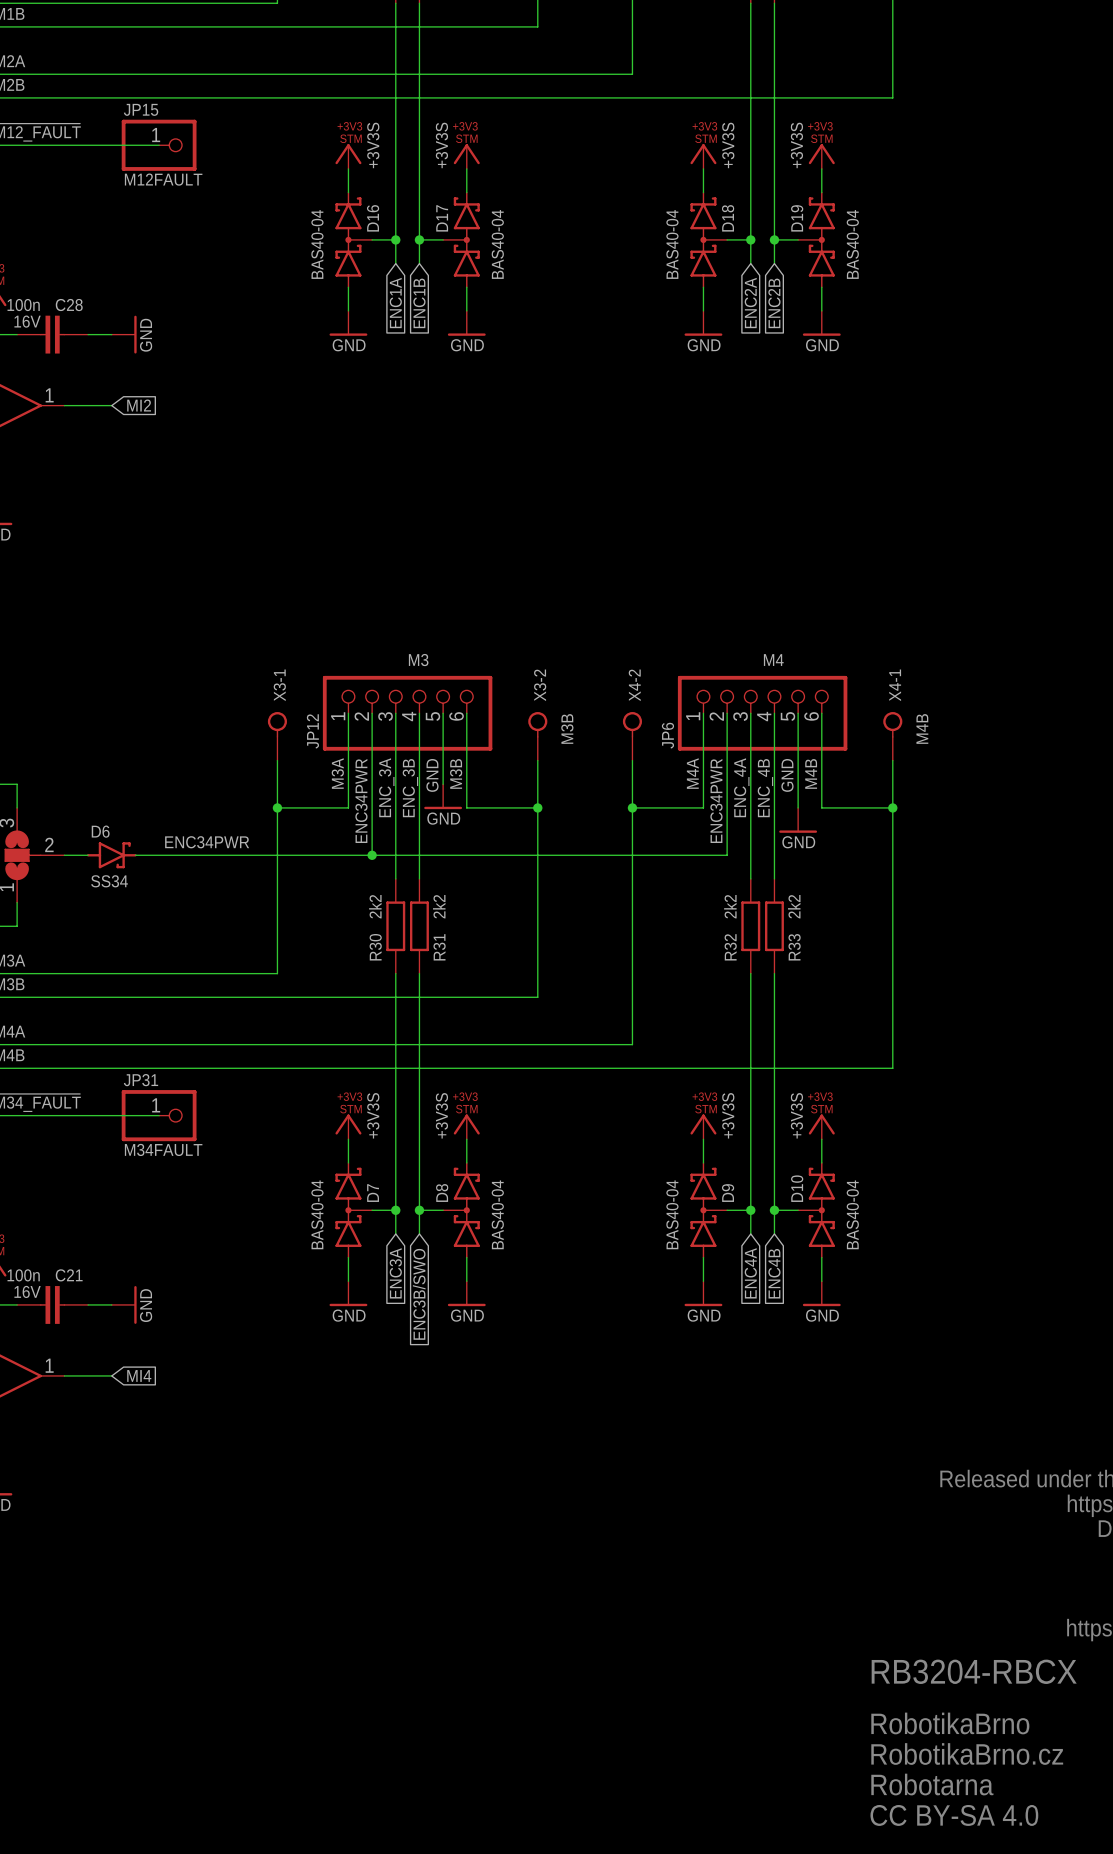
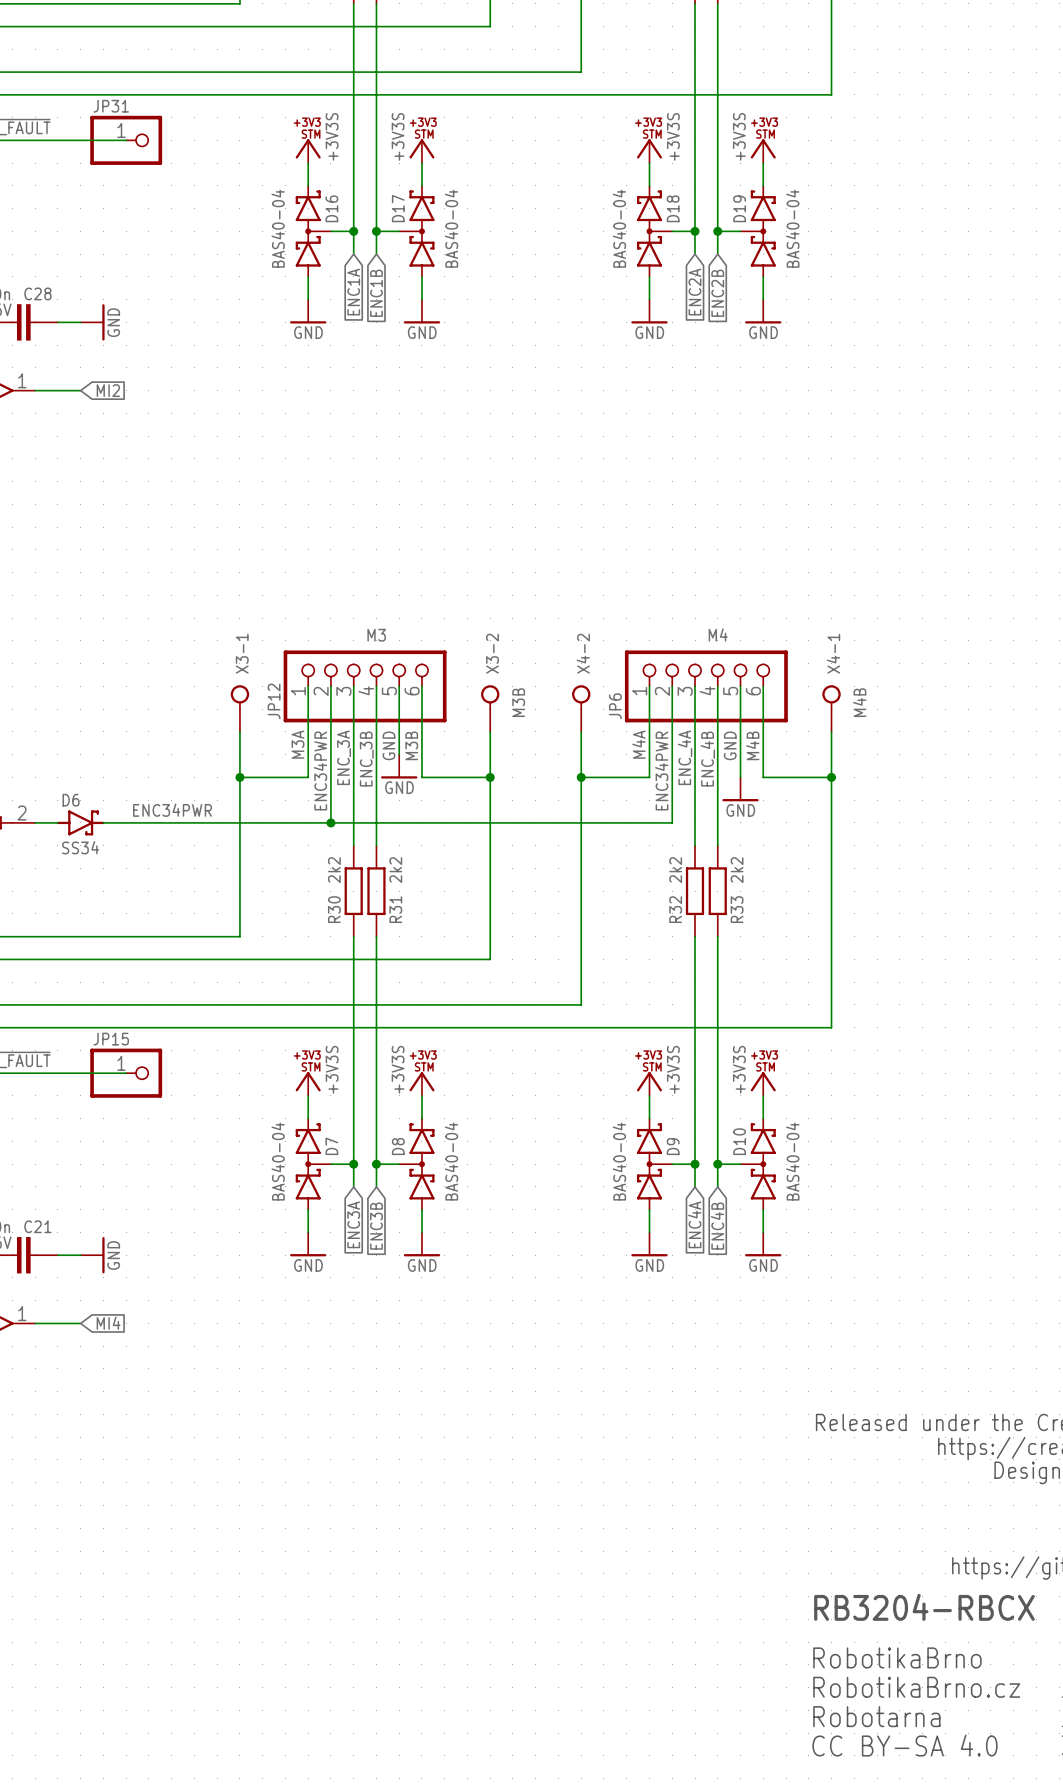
JP15 name: JP15 (141, 109) -> JP31 (111, 106)
JP15 value: M12FAULT (163, 179) -> none
JP31 name: JP31 (140, 1080) -> JP15 (111, 1039)
JP31 value: M34FAULT (163, 1149) -> none
global label: ENC3B/SWO (419, 1294) -> ENC3B (376, 1226)

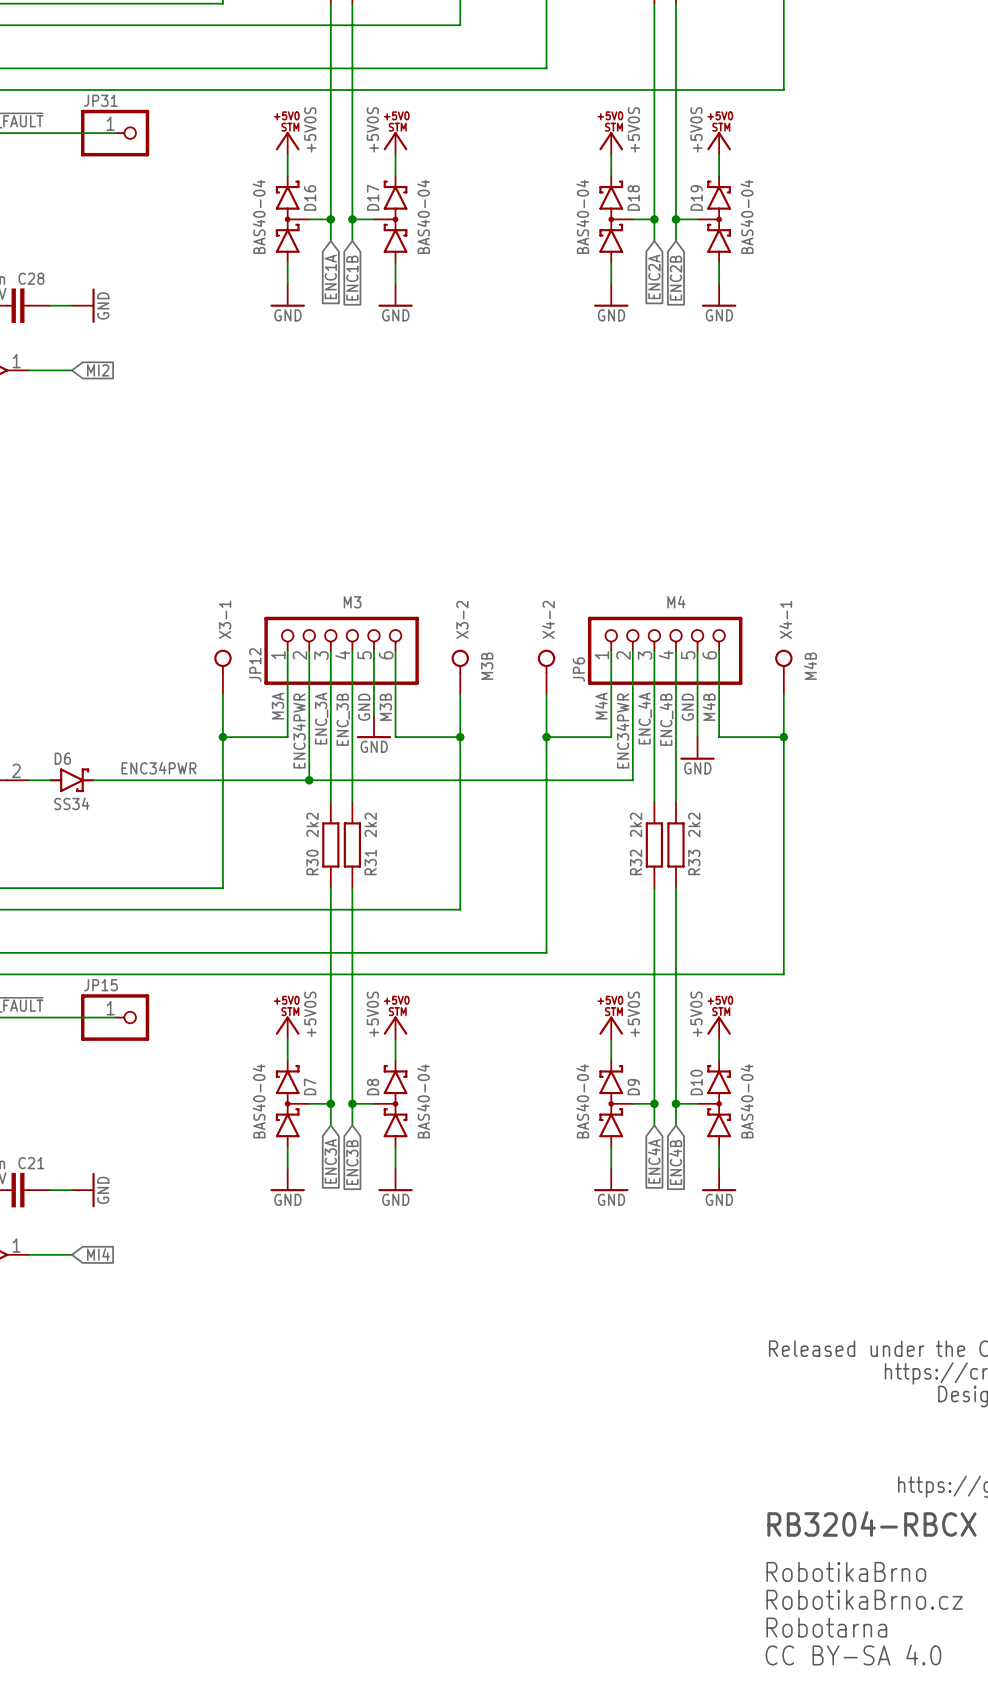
power symbol: +3V3S (308, 151) -> +5V0S (287, 143)
power symbol: +3V3S (421, 151) -> +5V0S (395, 143)
power symbol: +3V3S (649, 151) -> +5V0S (611, 143)
power symbol: +3V3S (763, 151) -> +5V0S (719, 143)
power symbol: +3V3S (308, 1084) -> +5V0S (287, 1027)
power symbol: +3V3S (421, 1084) -> +5V0S (395, 1027)
power symbol: +3V3S (649, 1084) -> +5V0S (611, 1027)
power symbol: +3V3S (763, 1084) -> +5V0S (719, 1027)

